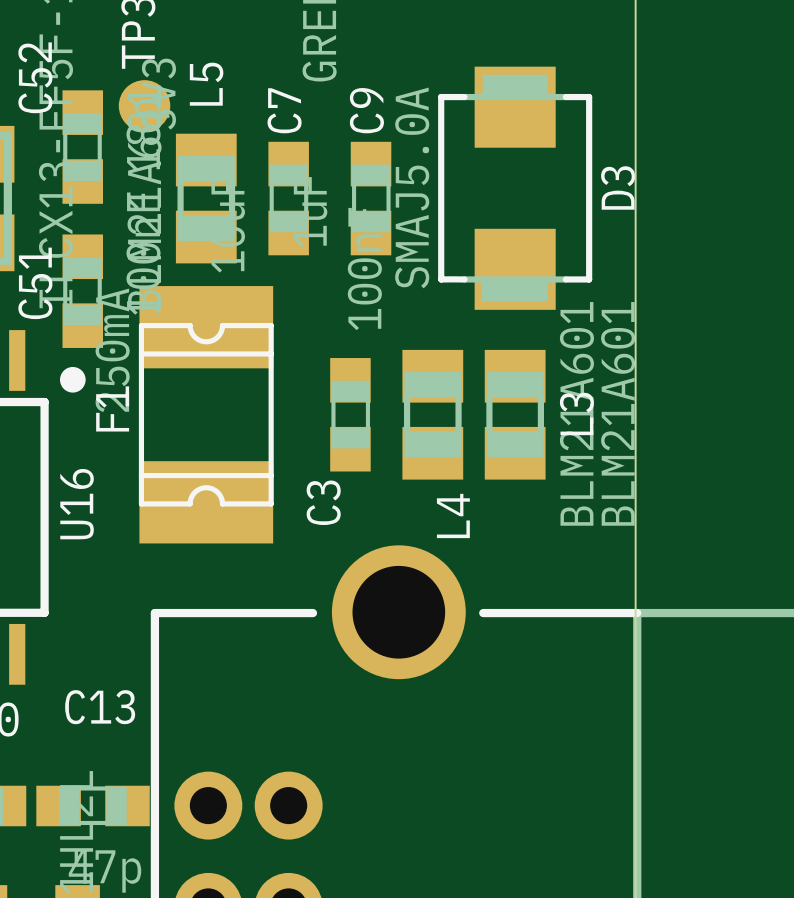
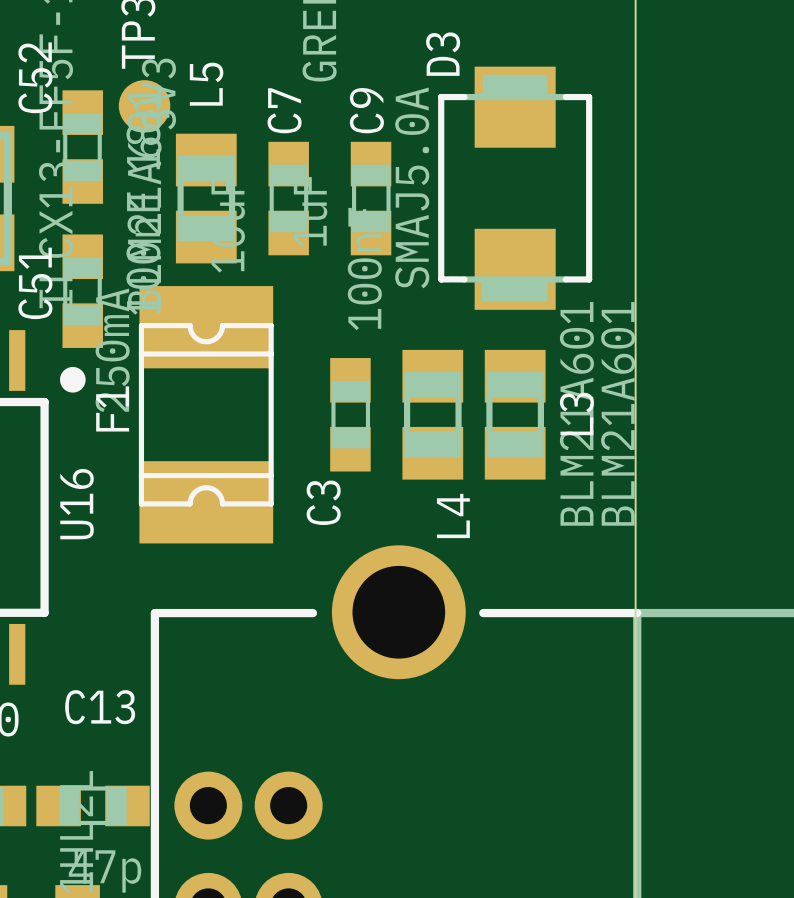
D3 name position: D3 (618, 187) -> D3 (443, 54)

